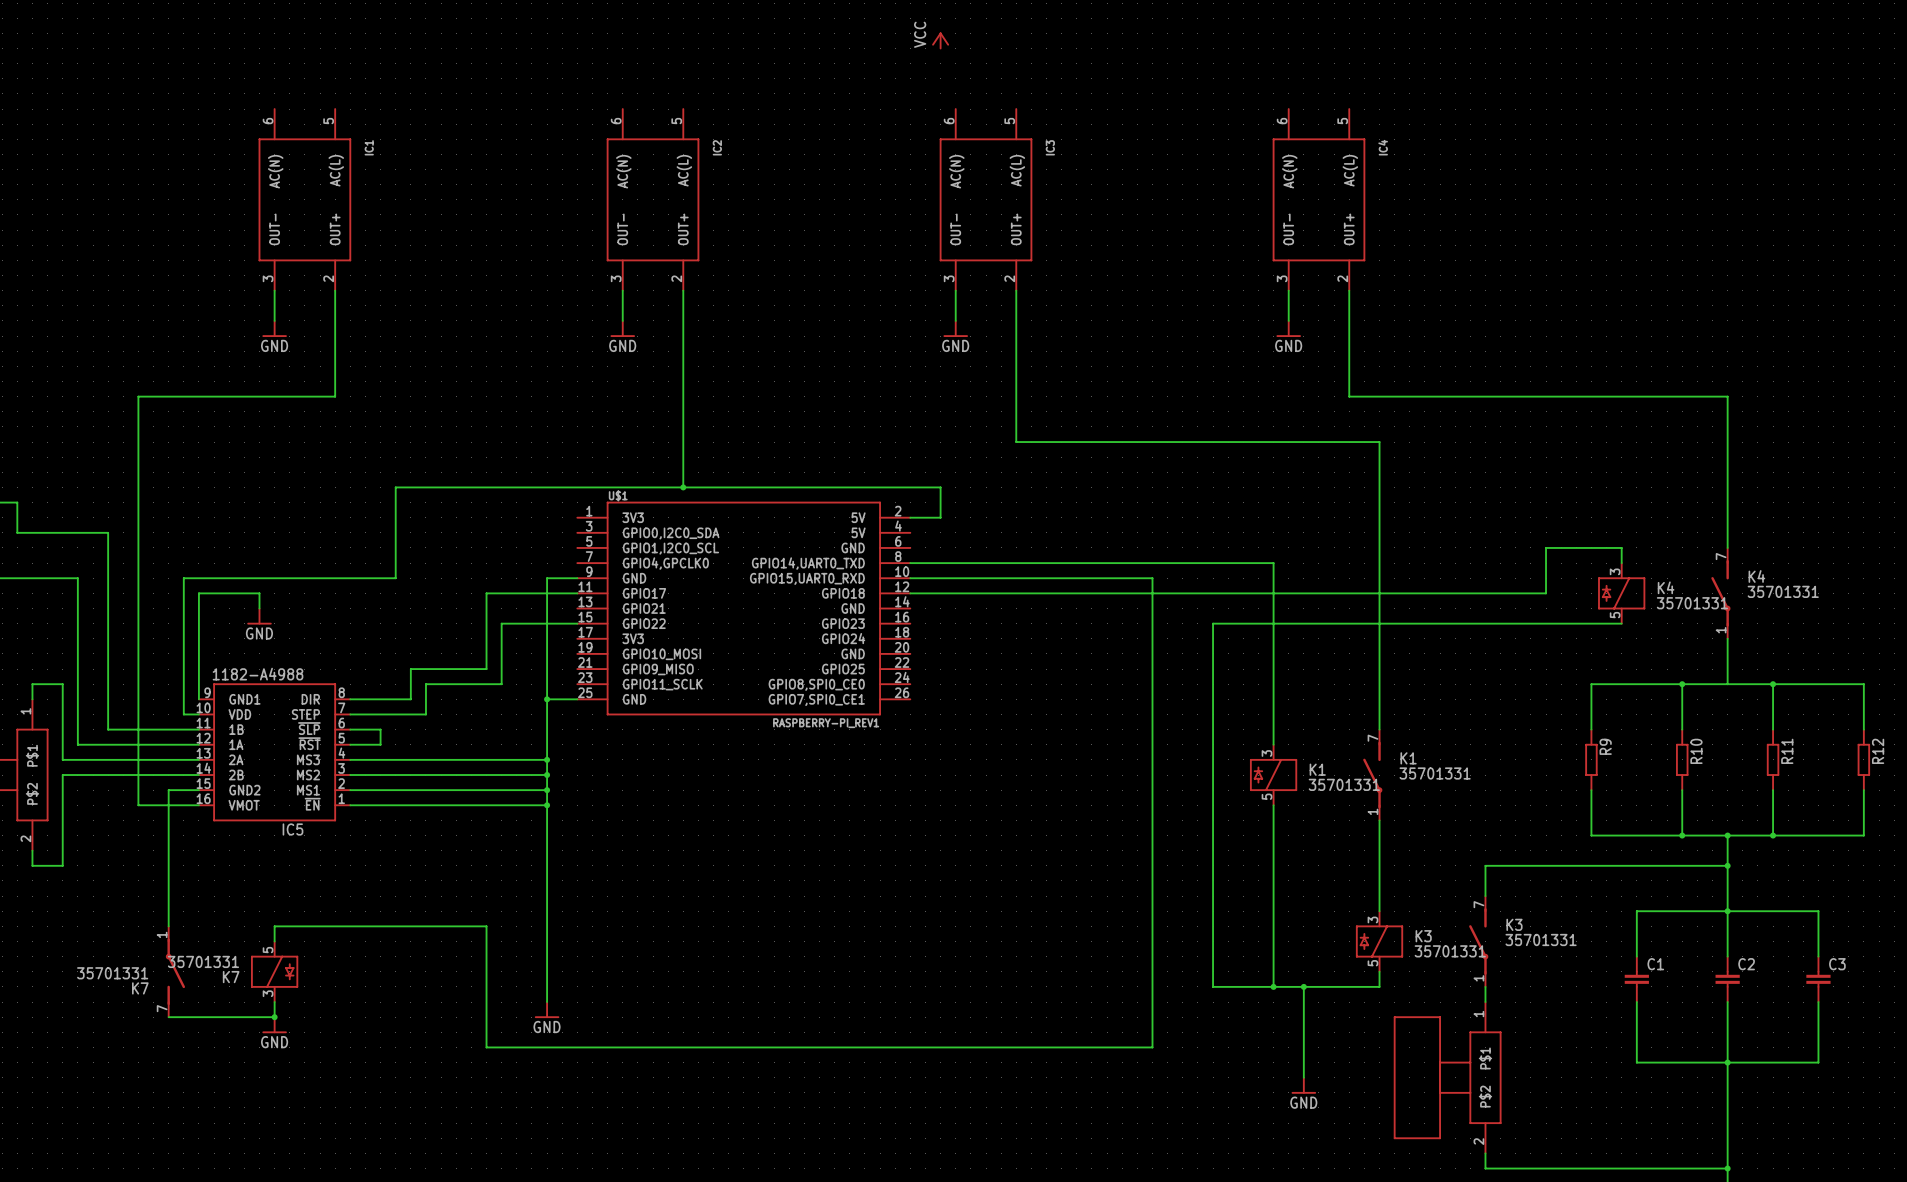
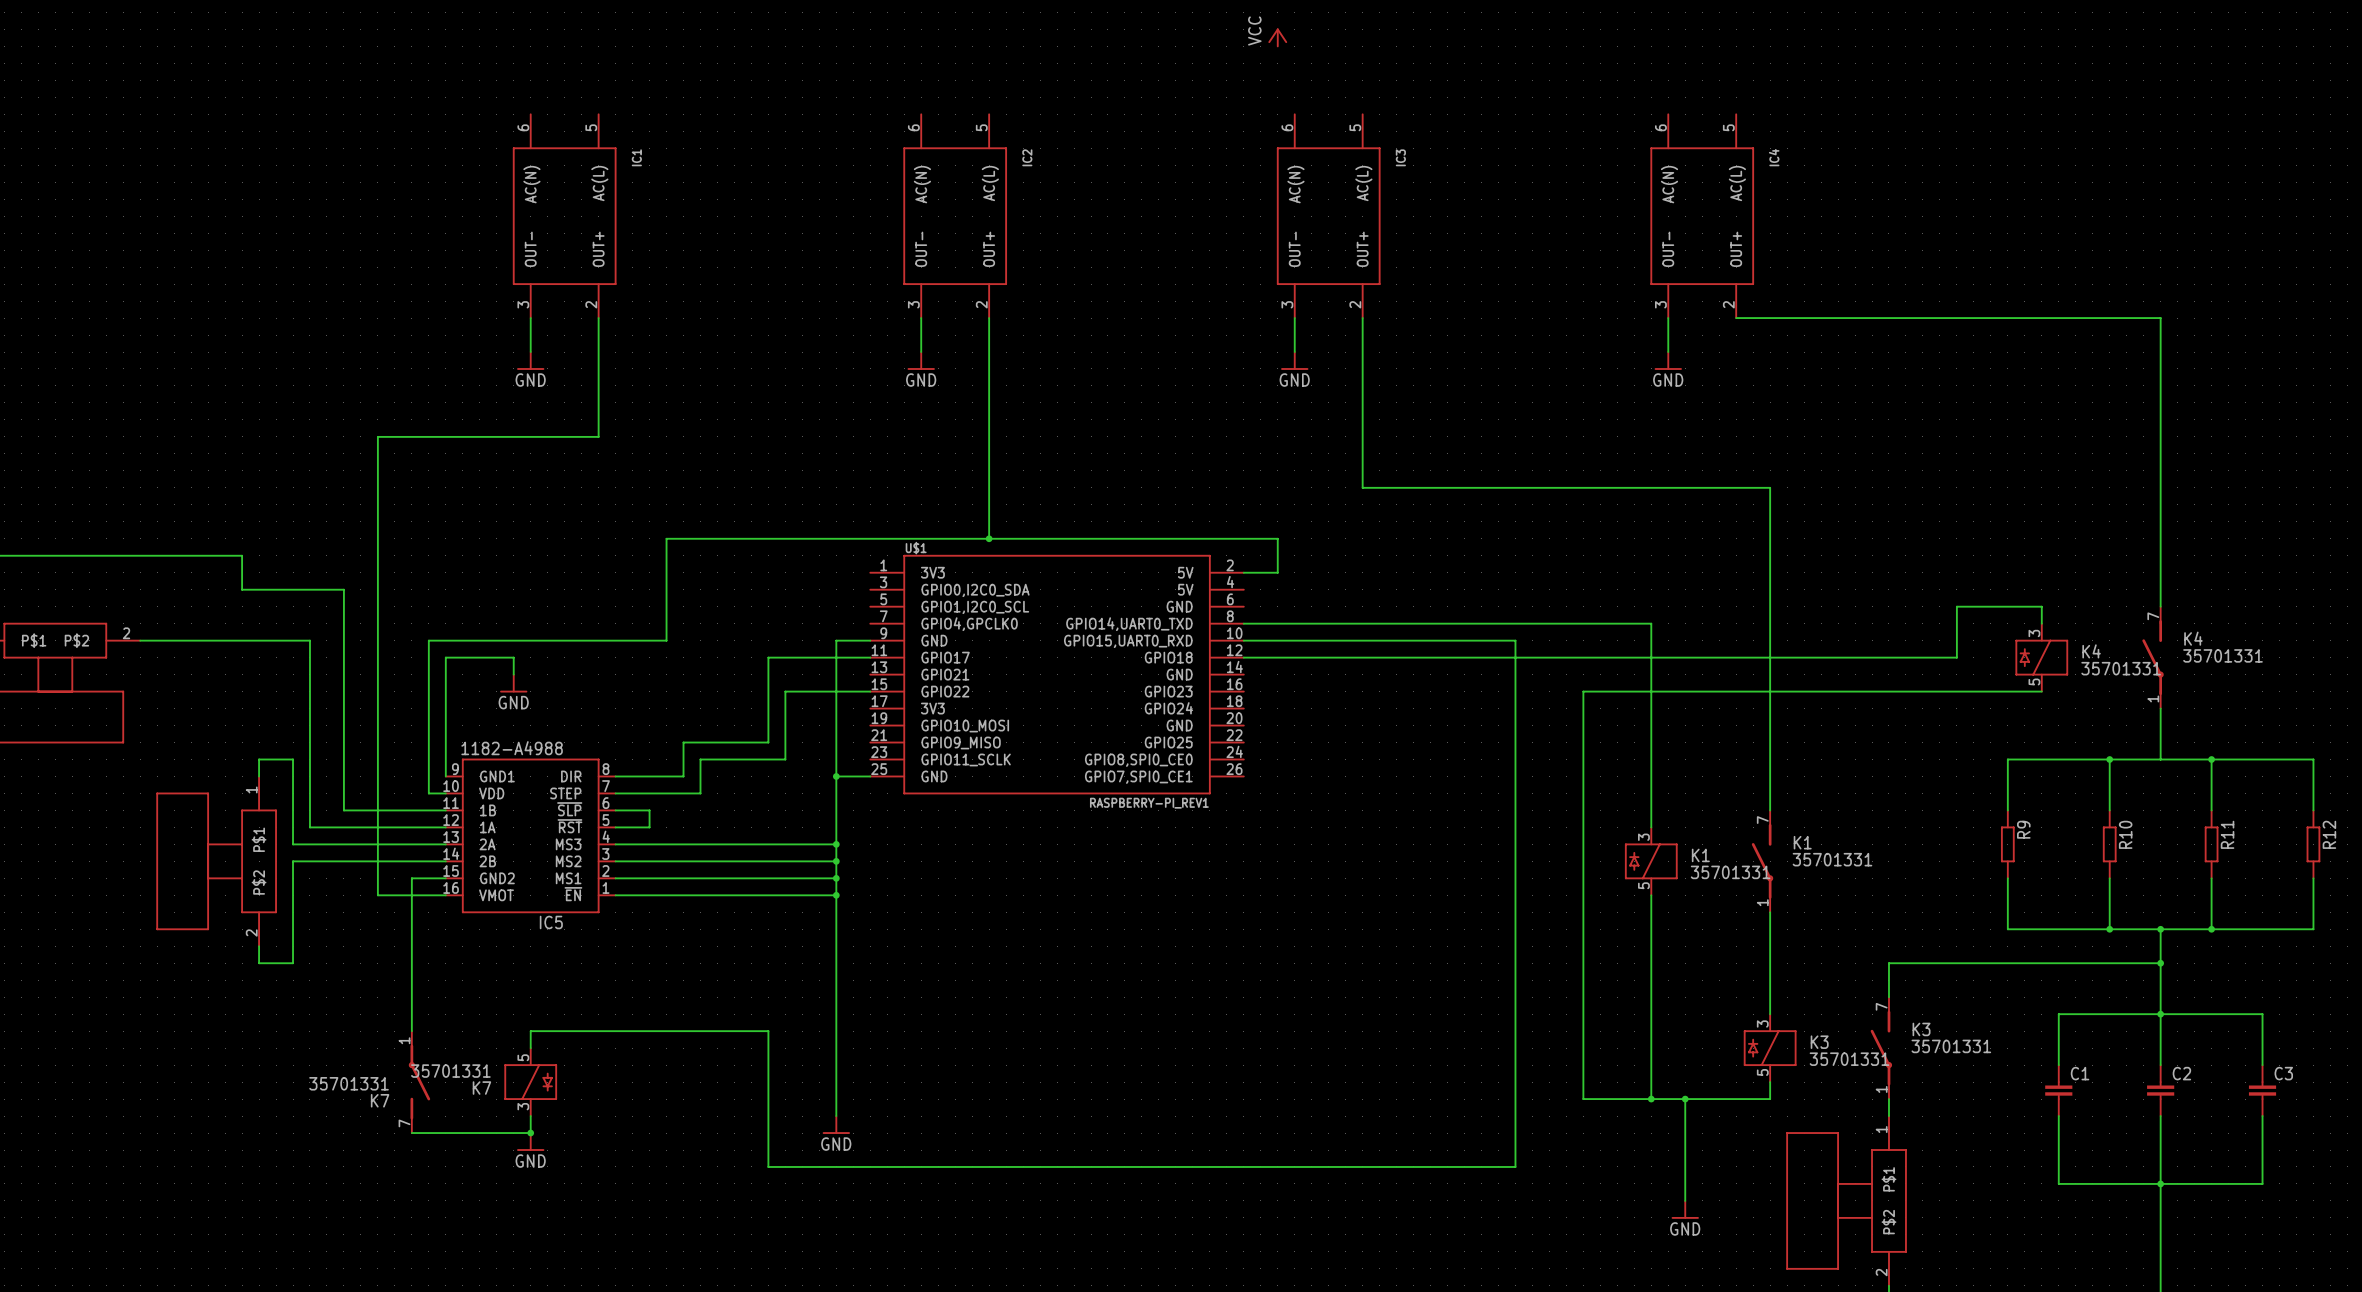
wire: (1349, 290) (1349, 396) (1727, 396) -> (1736, 318) (2160, 318) (2160, 436)

